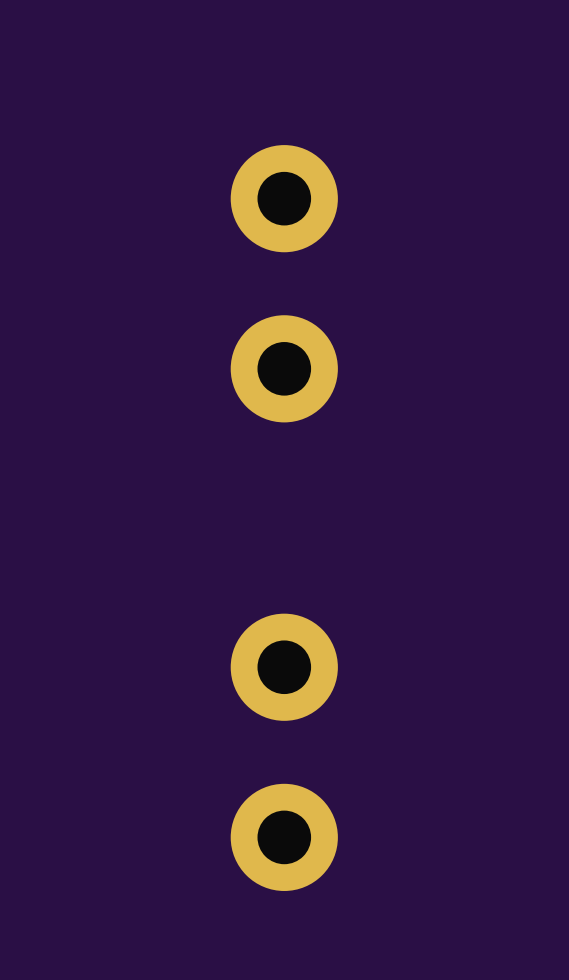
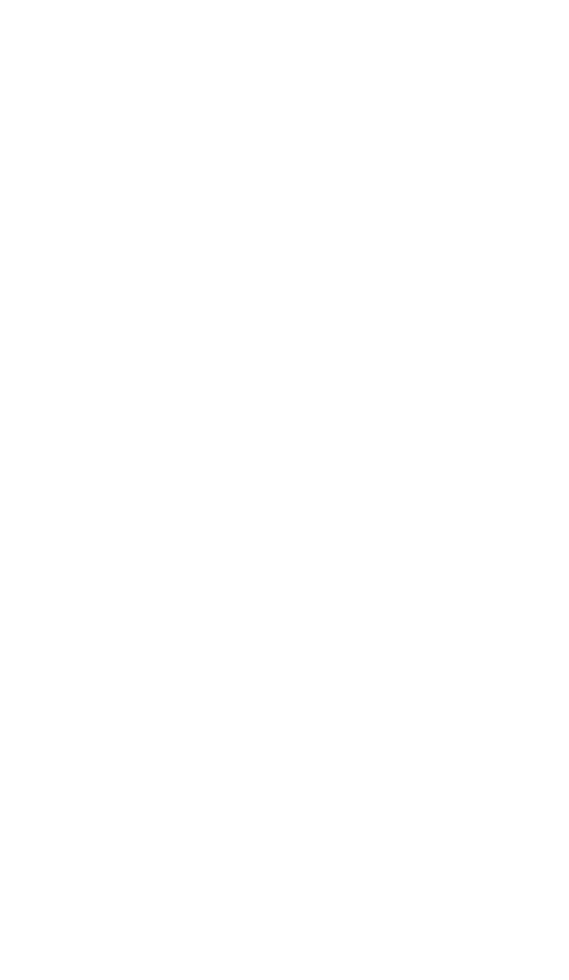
part: (284, 283) -> none
part: (284, 752) -> none

